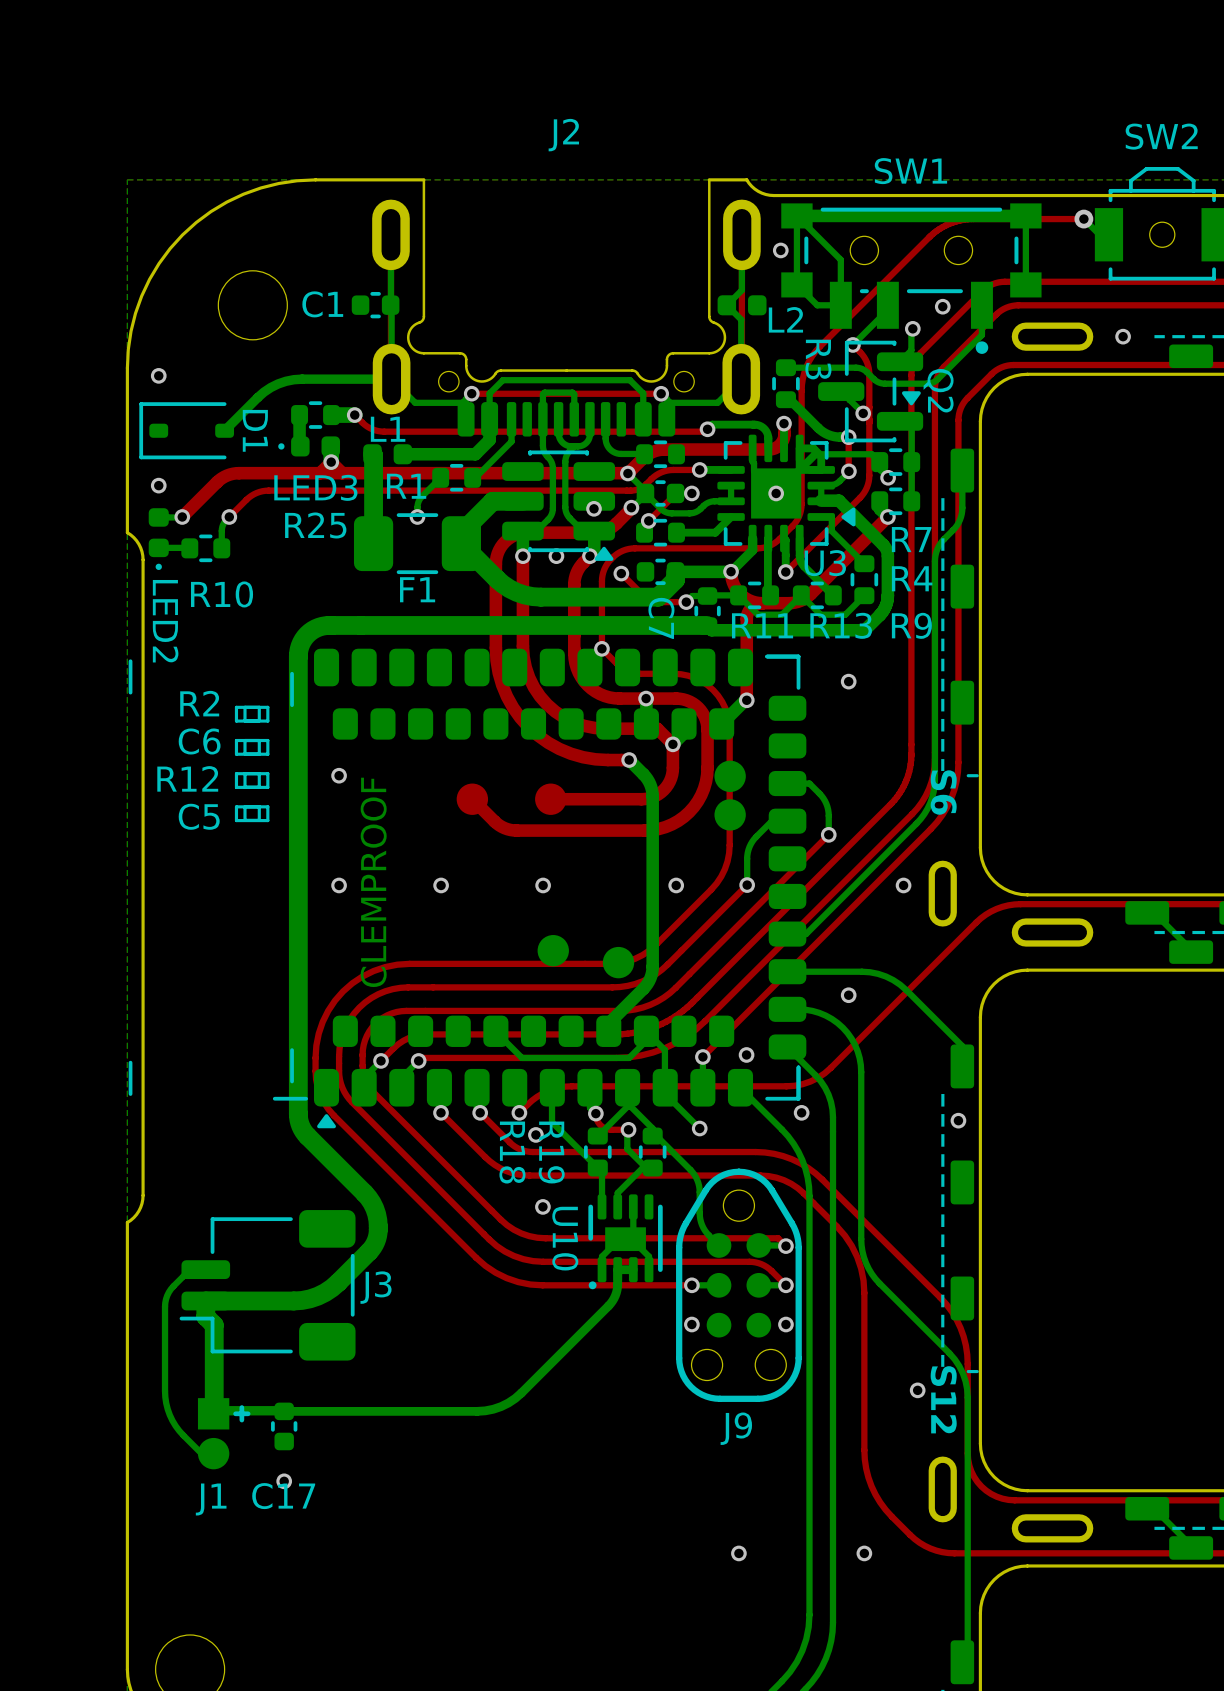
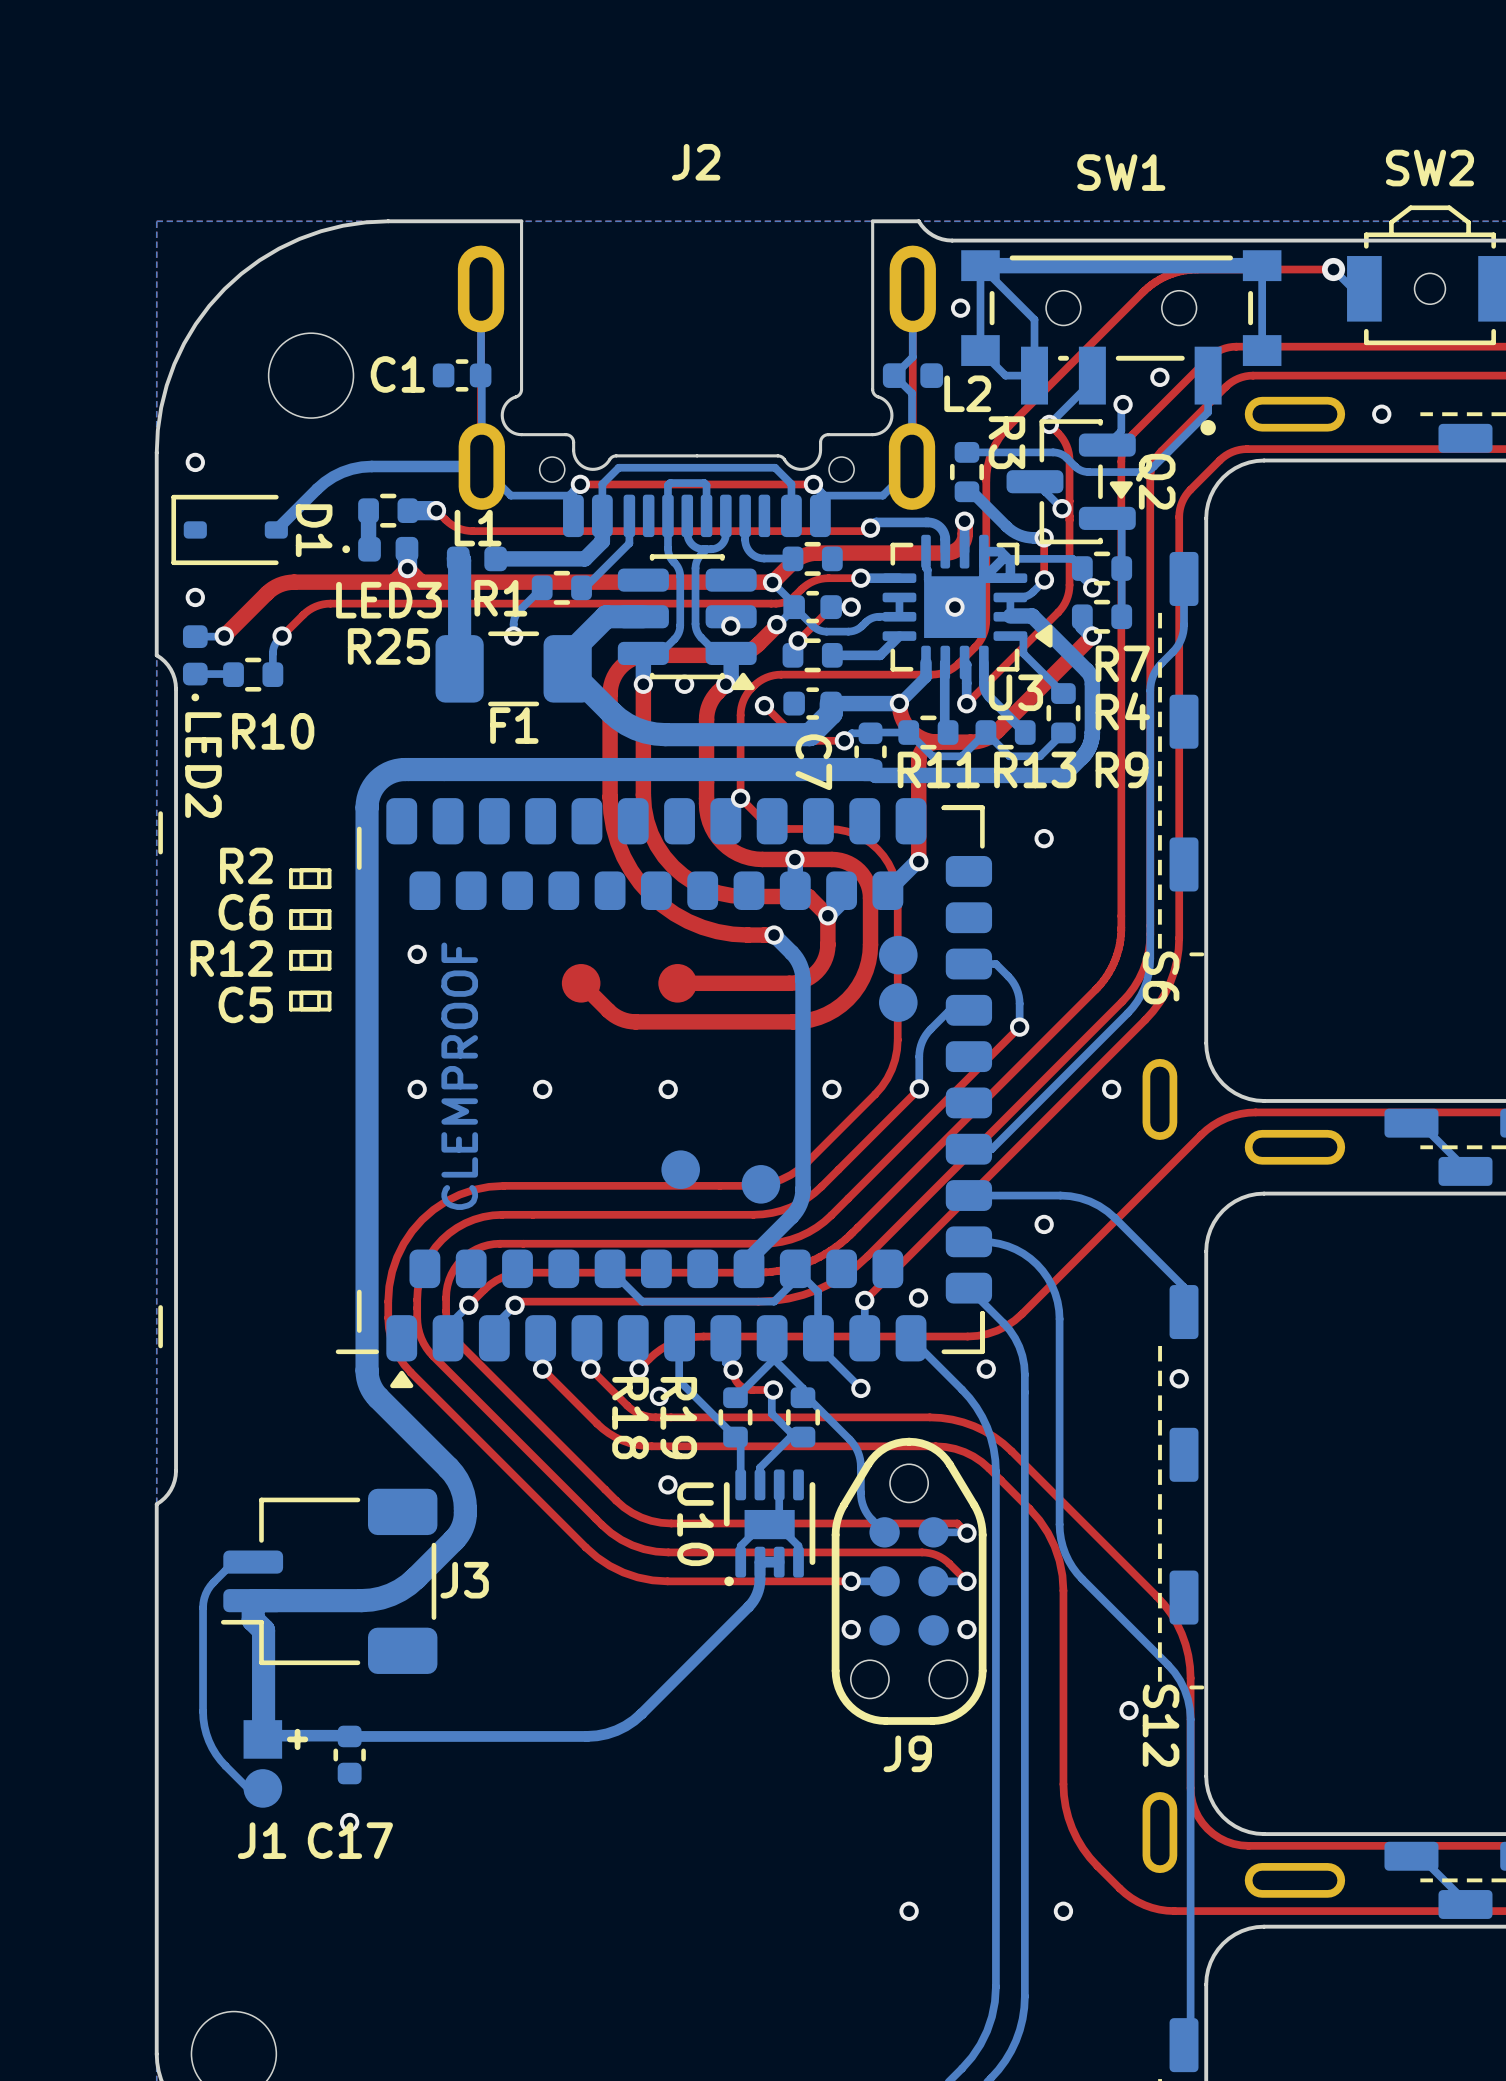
SW1 name position: SW1 (910, 171) -> SW1 (1121, 172)

